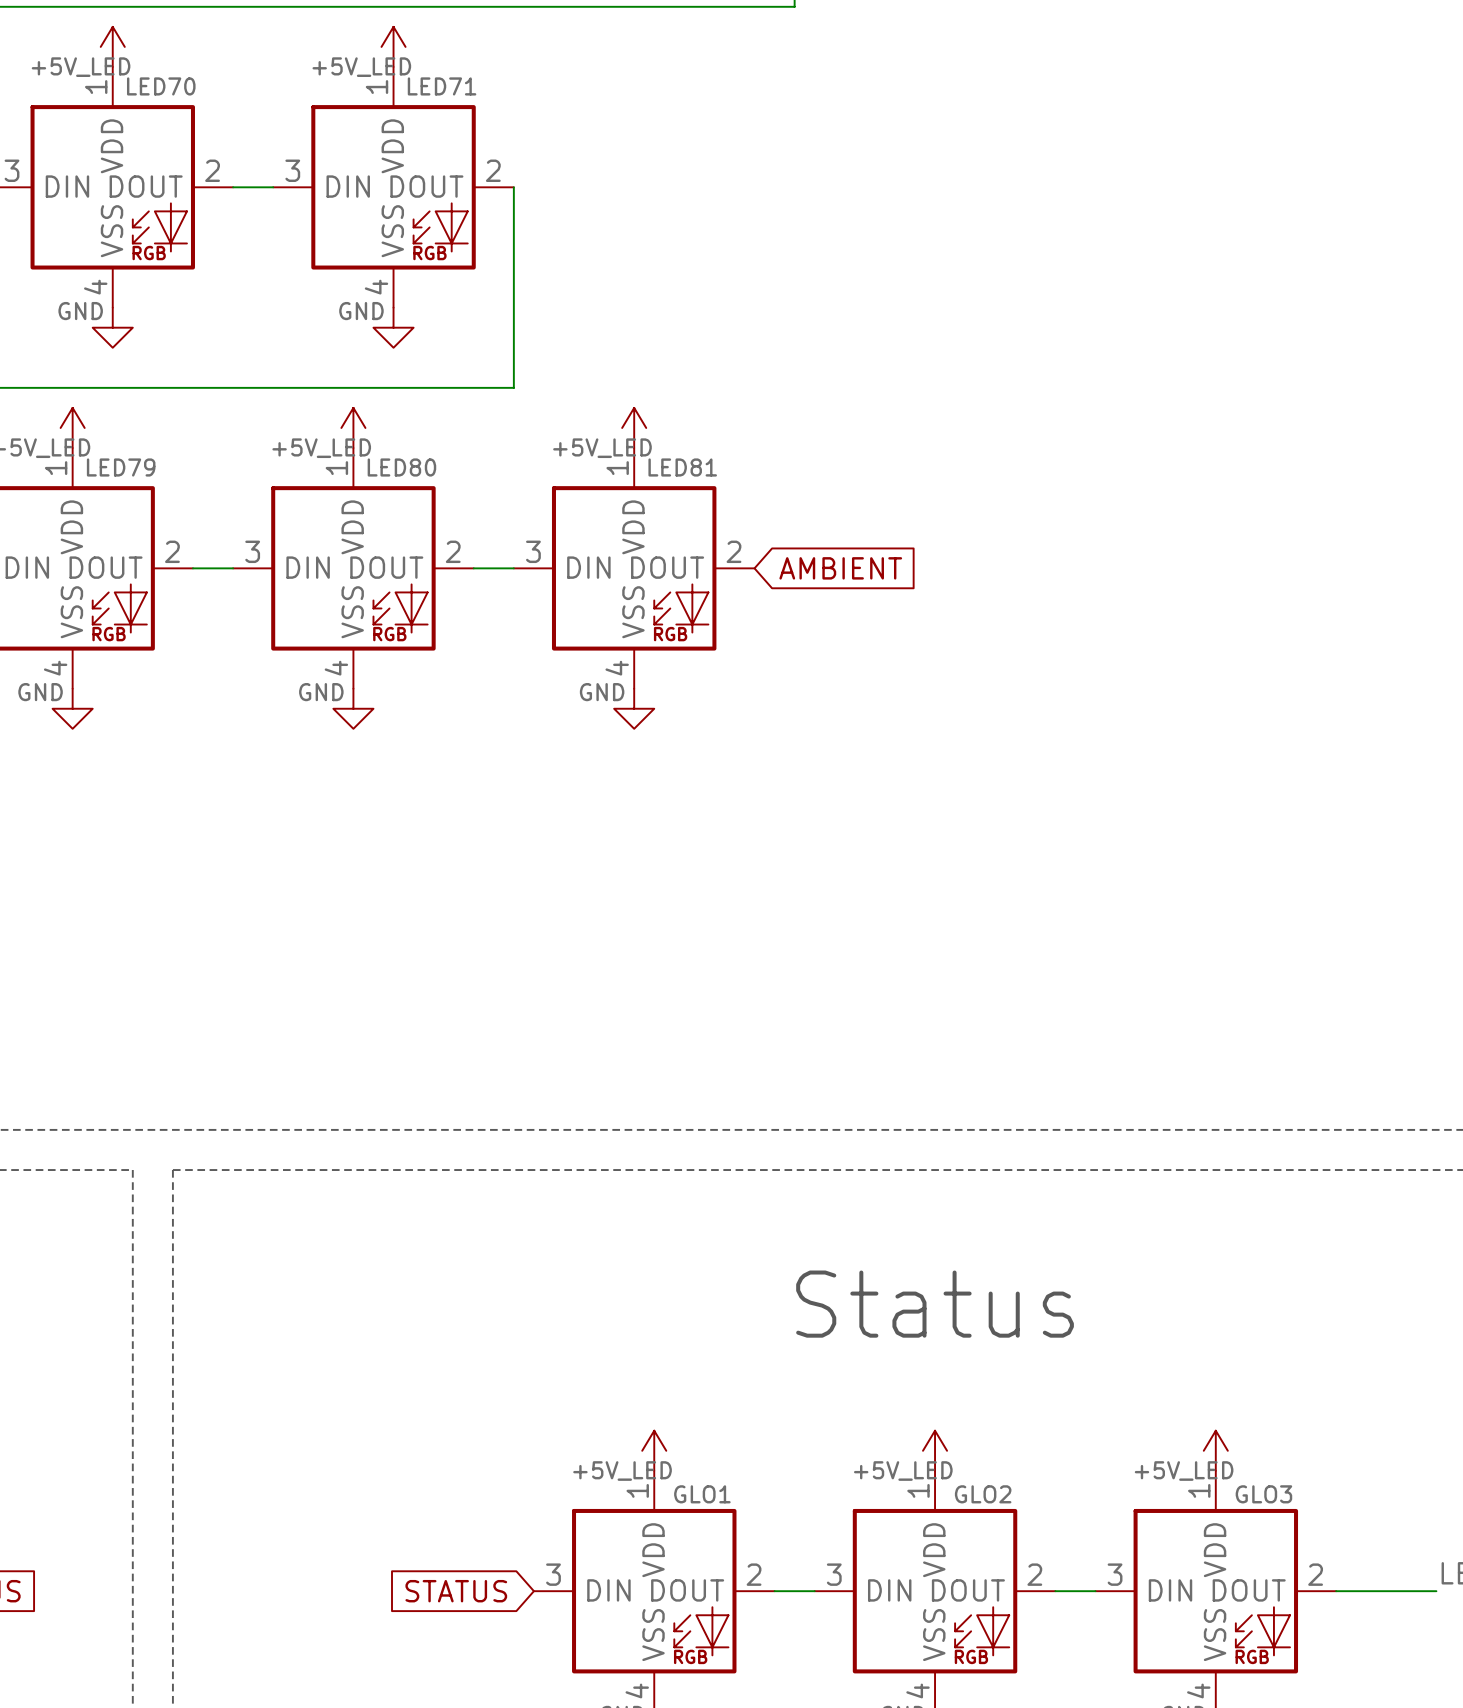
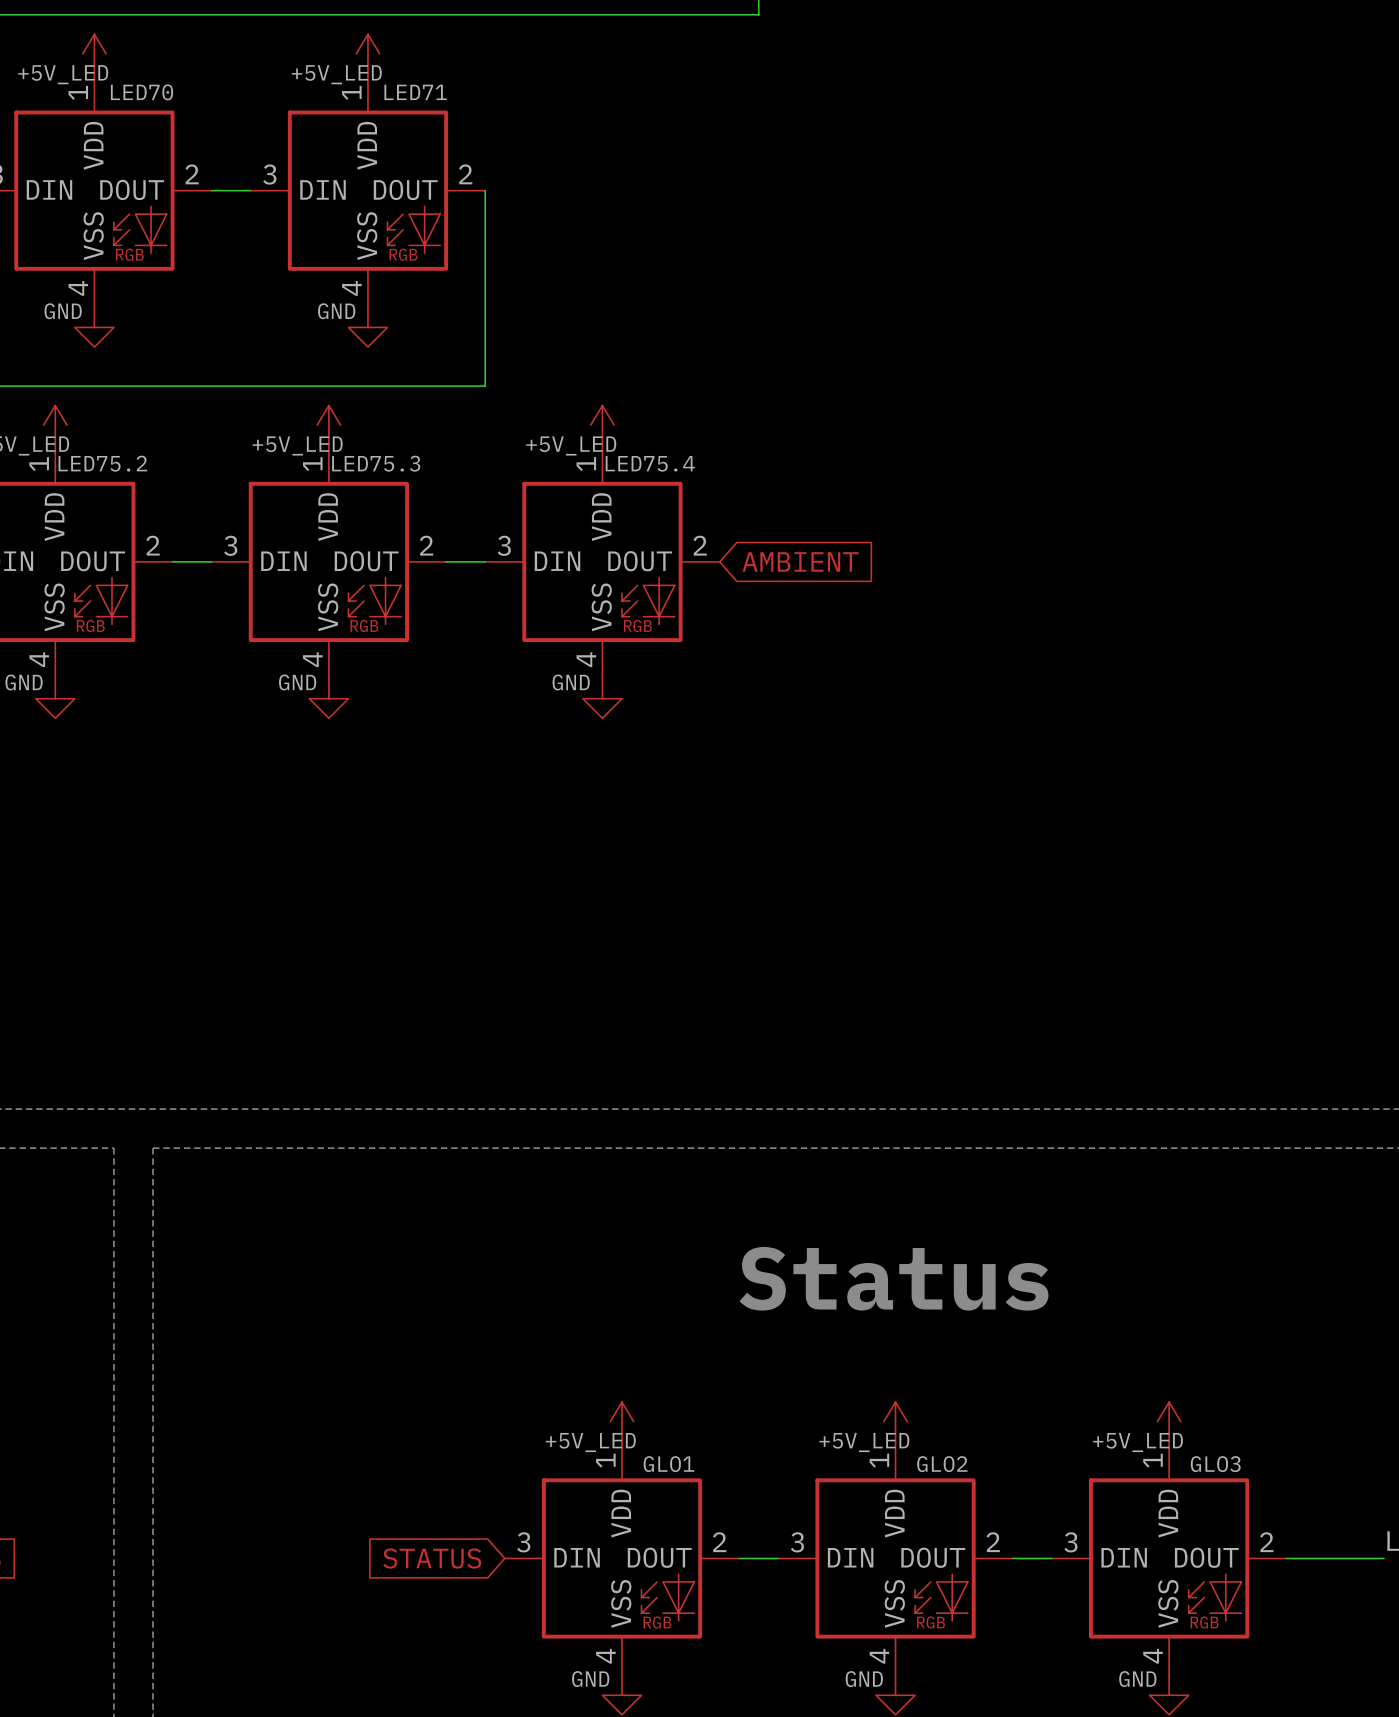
LED79 name: LED79 (121, 467) -> LED75.2 (102, 463)
LED80 name: LED80 (401, 467) -> LED75.3 (376, 463)
LED81 name: LED81 (682, 467) -> LED75.4 (650, 463)

